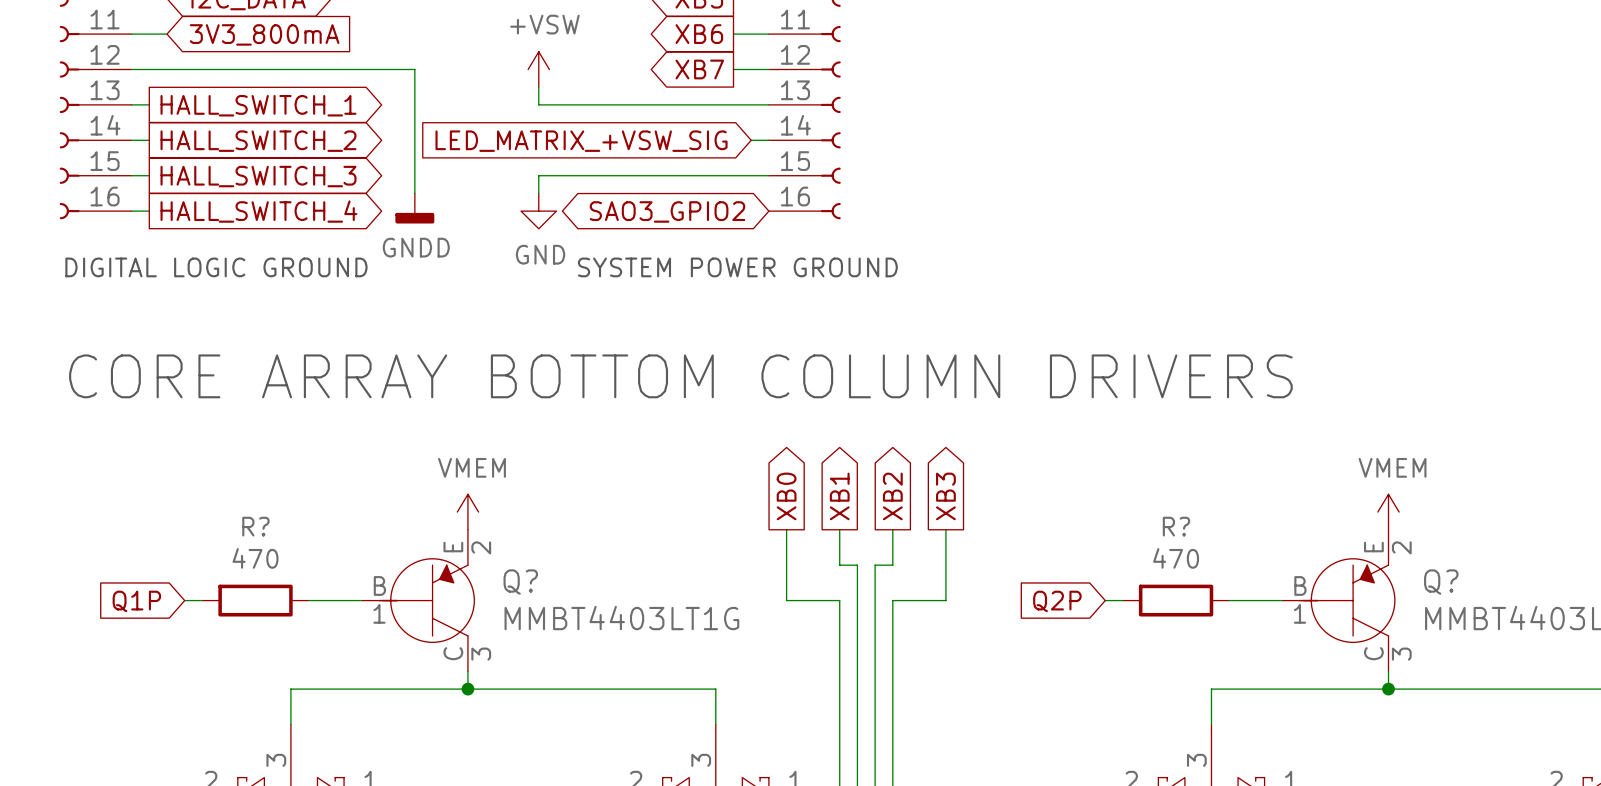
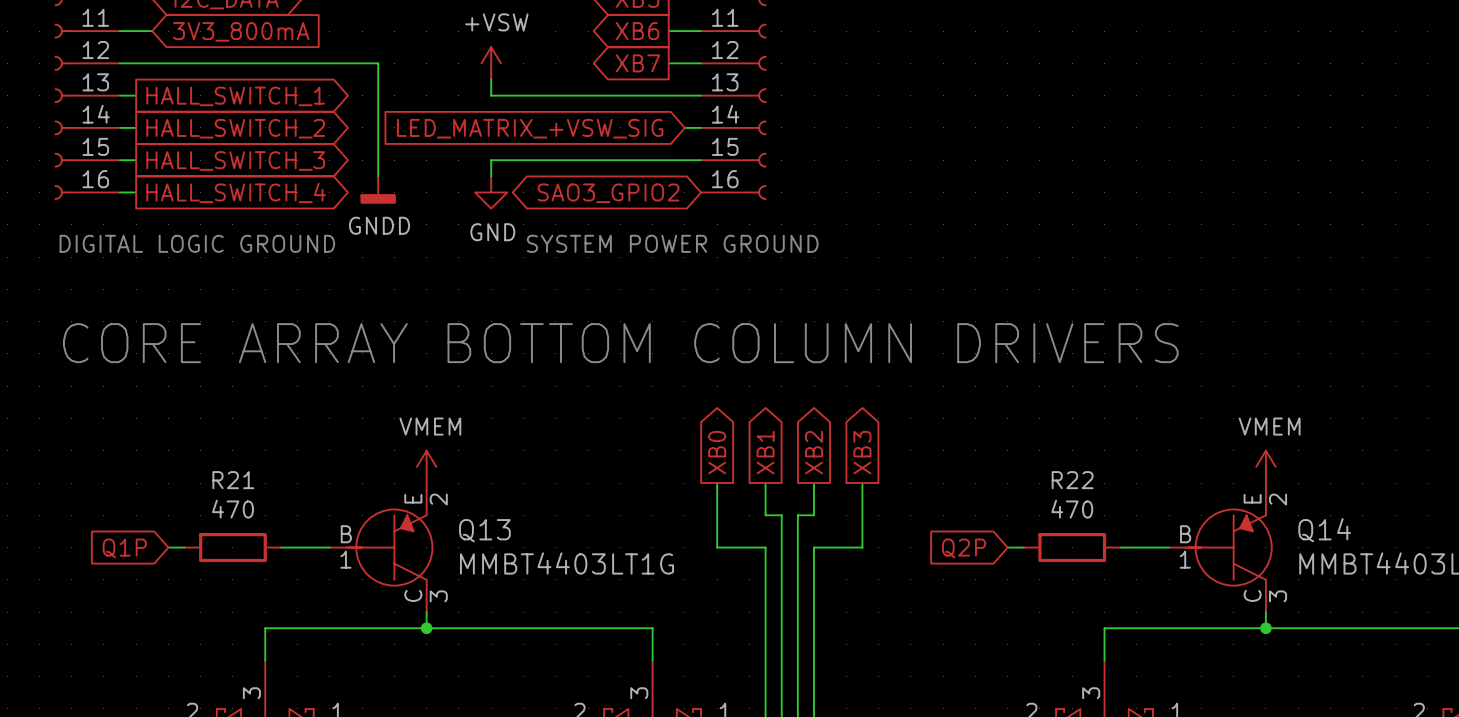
R? name: R? (255, 526) -> R21 (233, 480)
R? name: R? (1176, 526) -> R22 (1072, 480)
Q? name: Q? (520, 582) -> Q13 (484, 530)
Q? name: Q? (1441, 582) -> Q14 (1324, 530)

